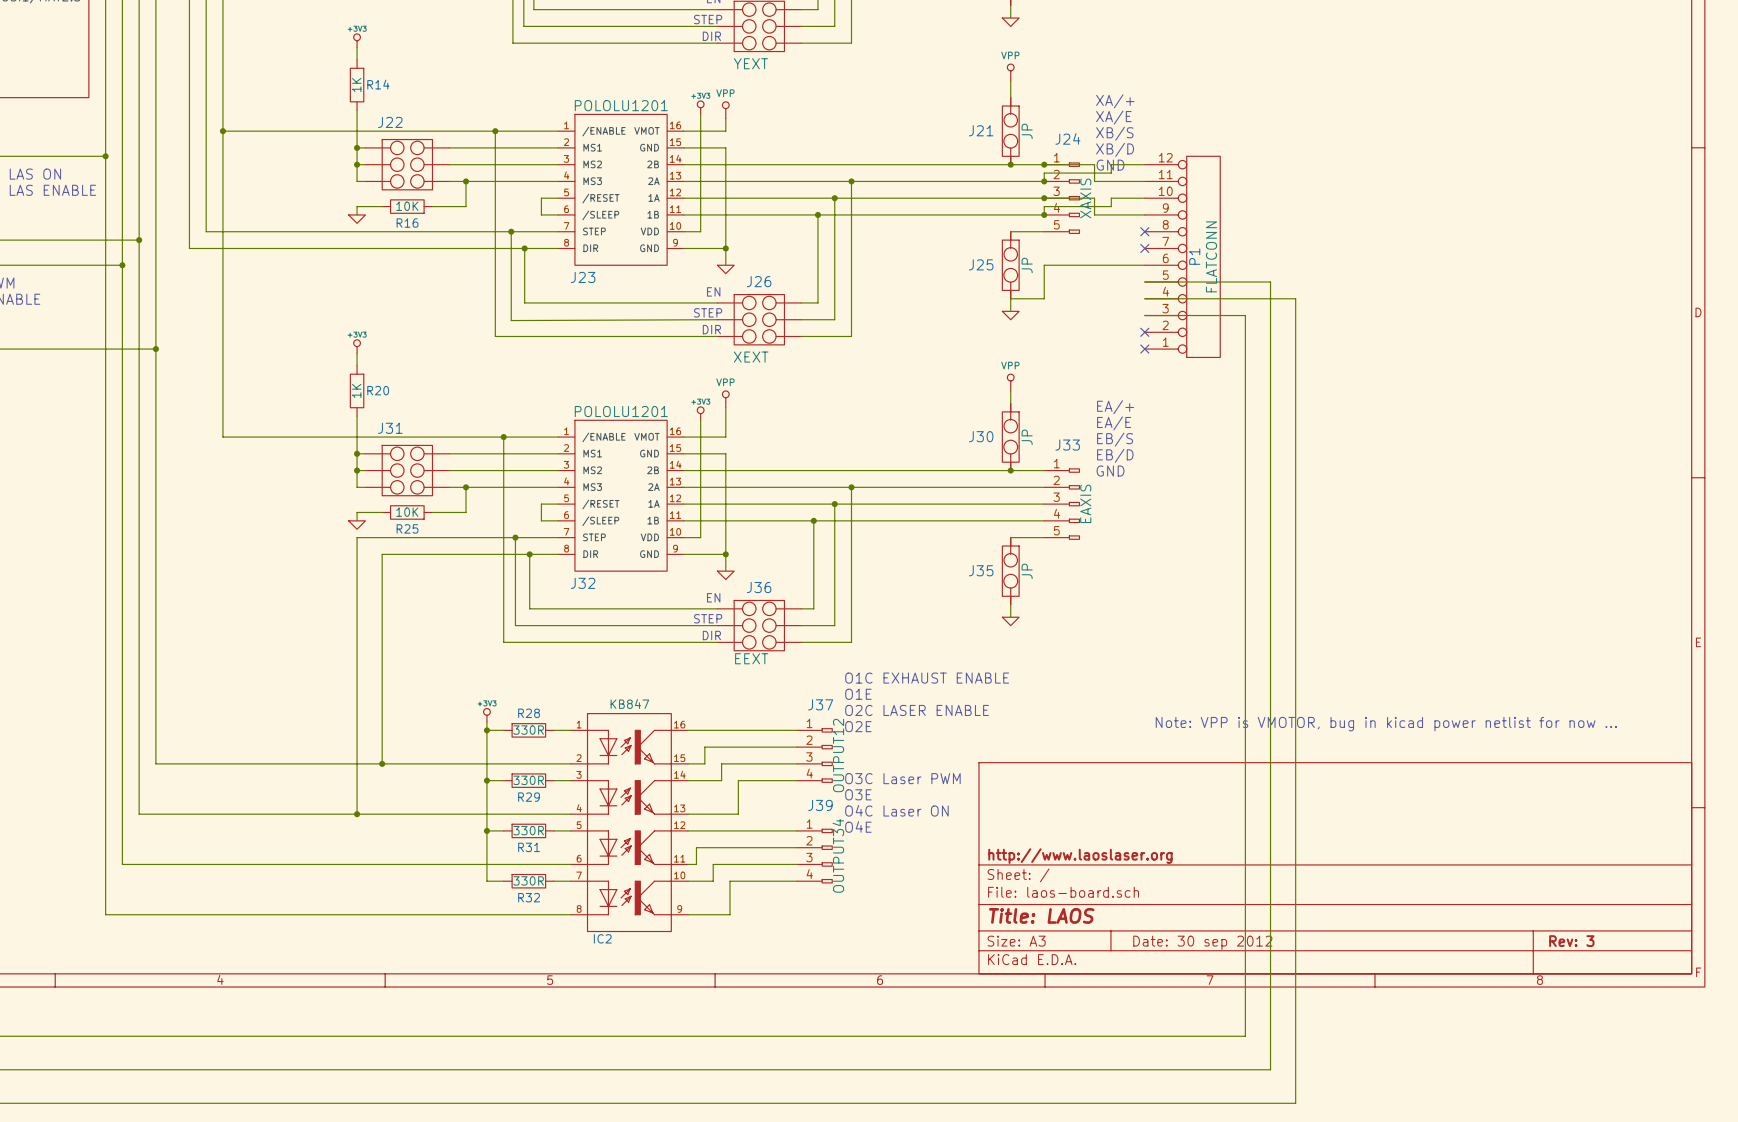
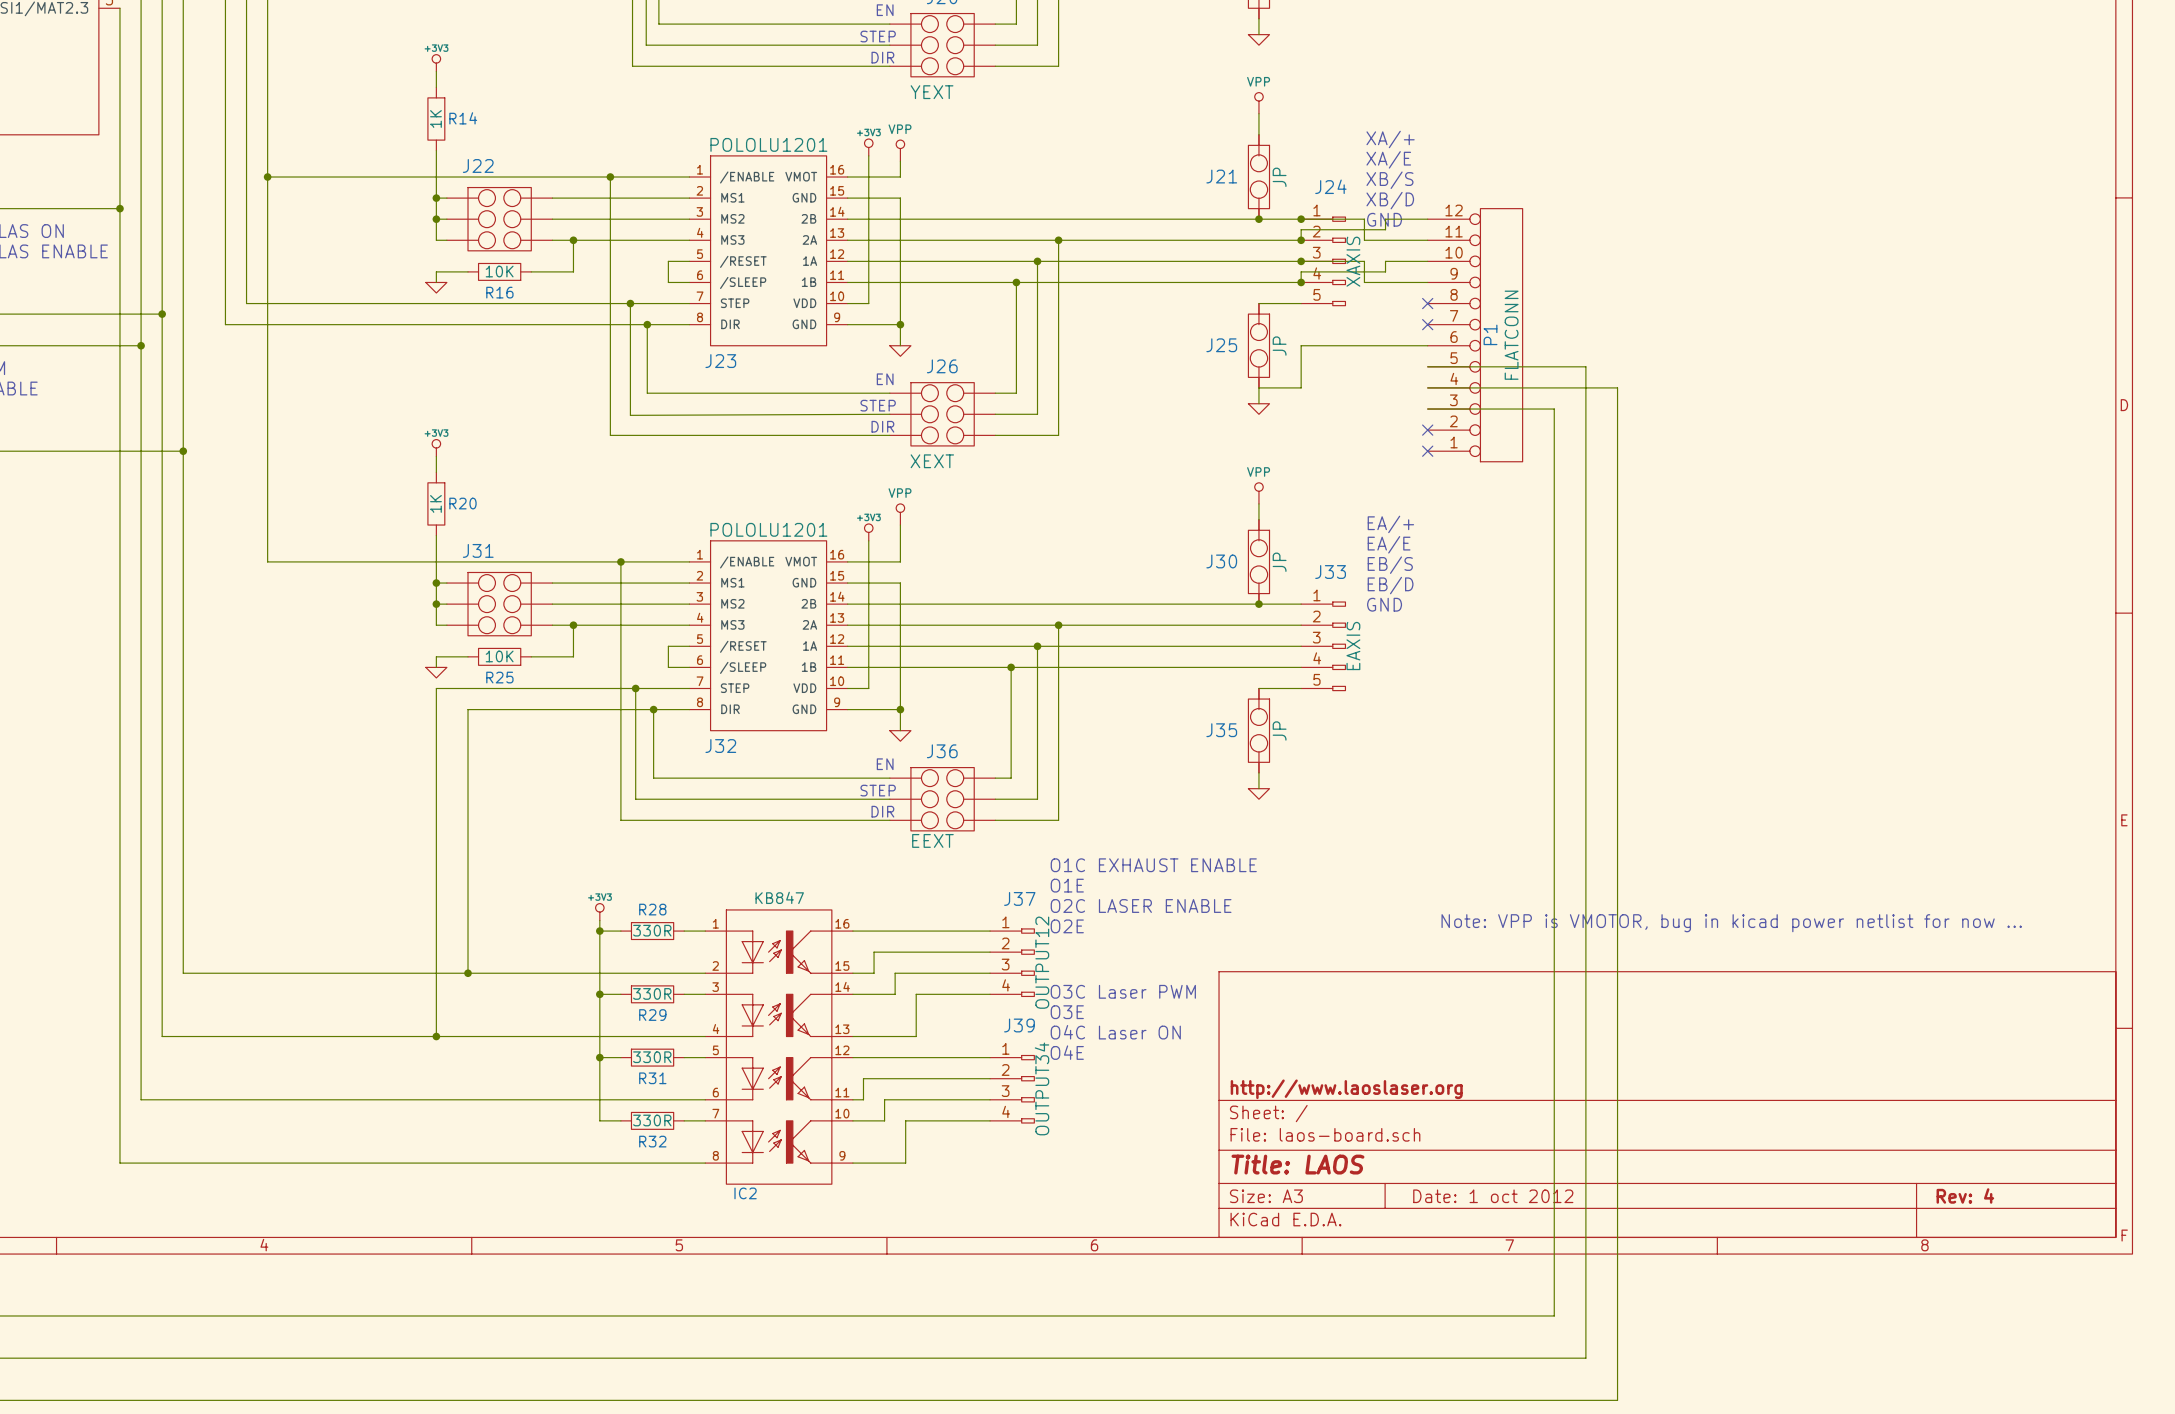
title block: Rev: 3 (1571, 941) -> Rev: 4 (1965, 1195)
title block: Date: 30 sep 2012 (1202, 942) -> Date: 1 oct 2012 (1493, 1196)

